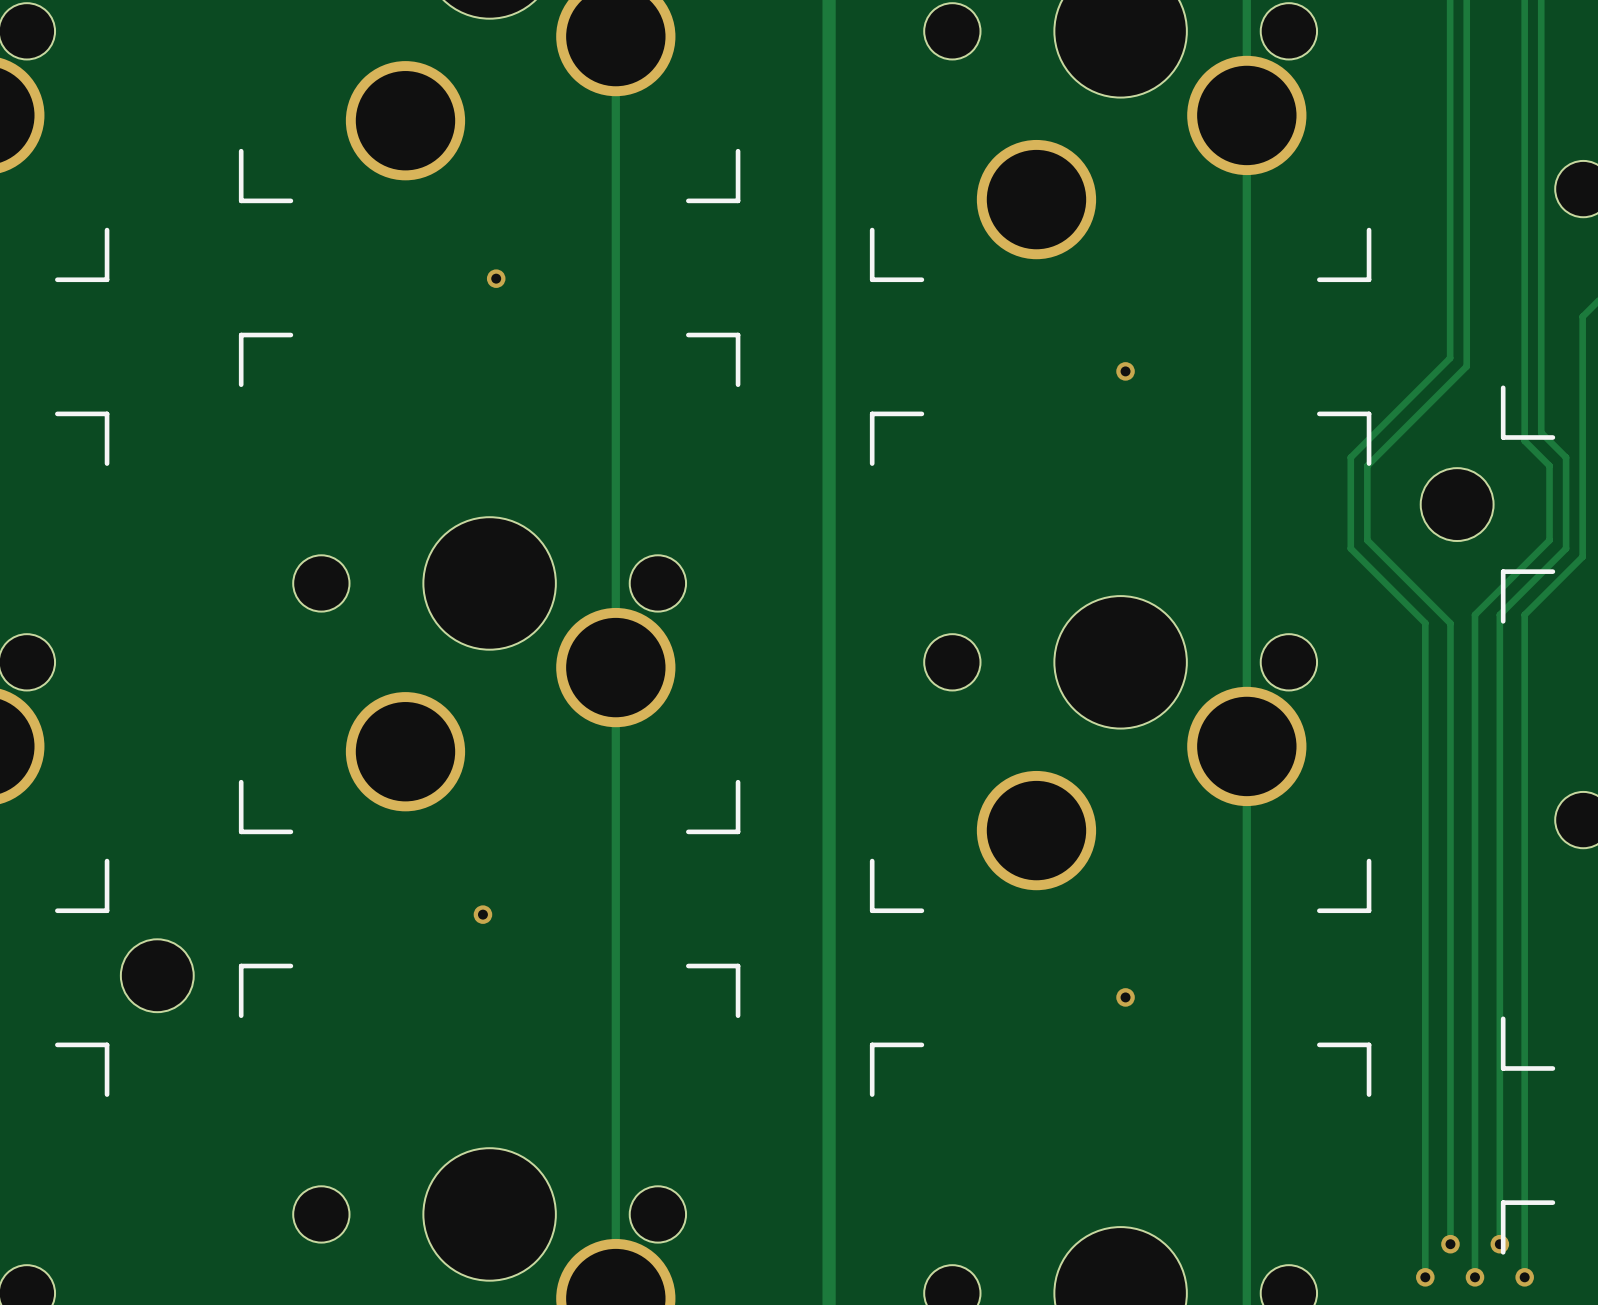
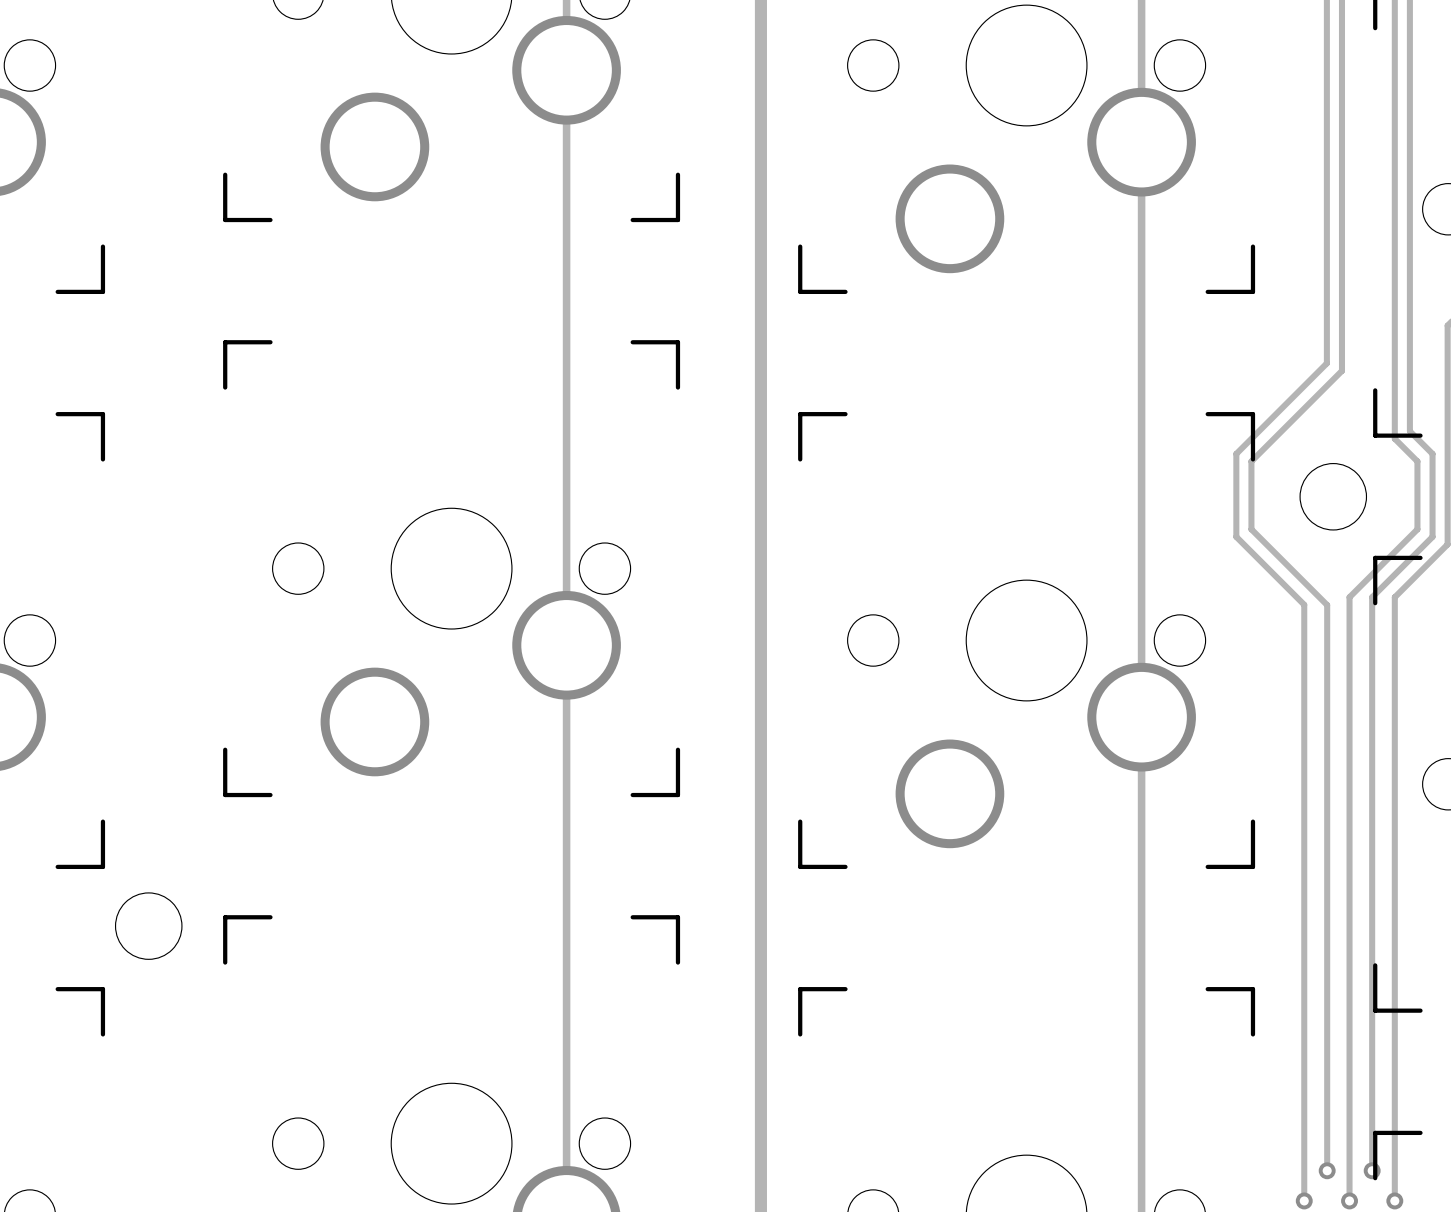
via: (496, 278) -> none
via: (1125, 371) -> none
via: (482, 914) -> none
via: (1125, 997) -> none

